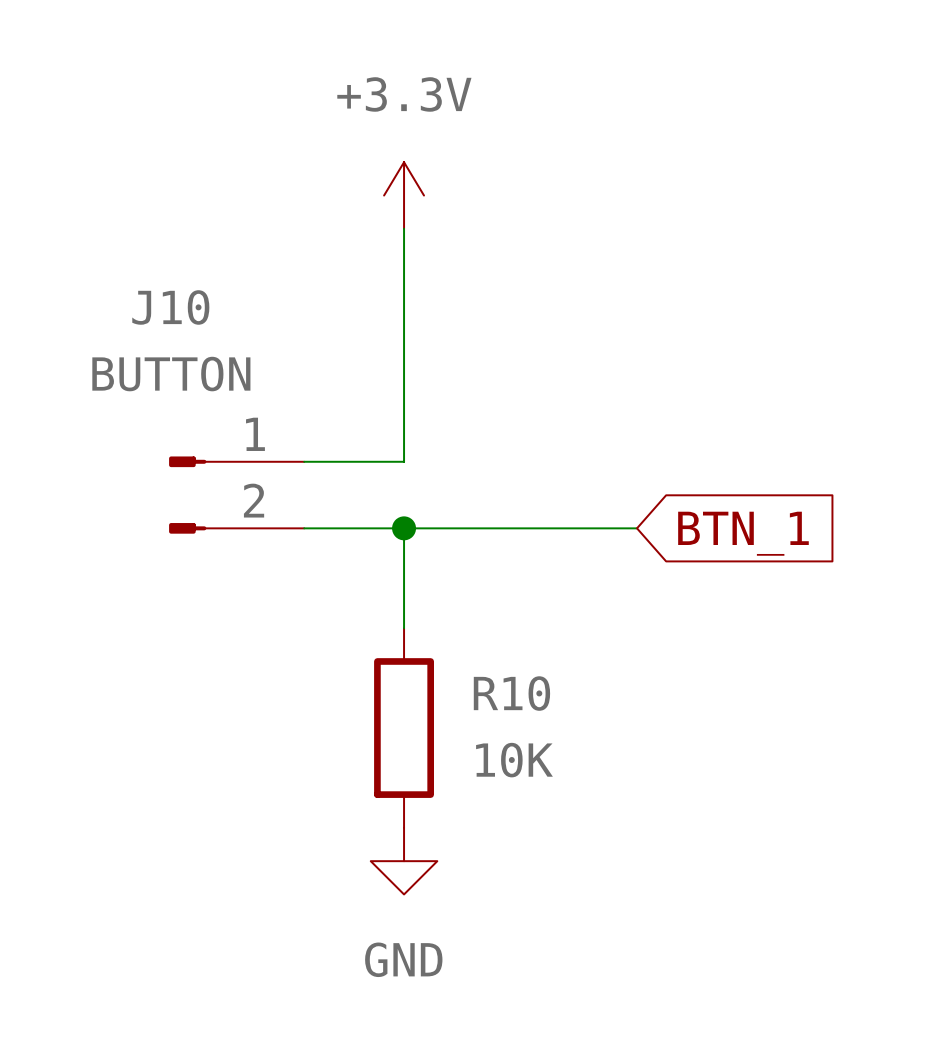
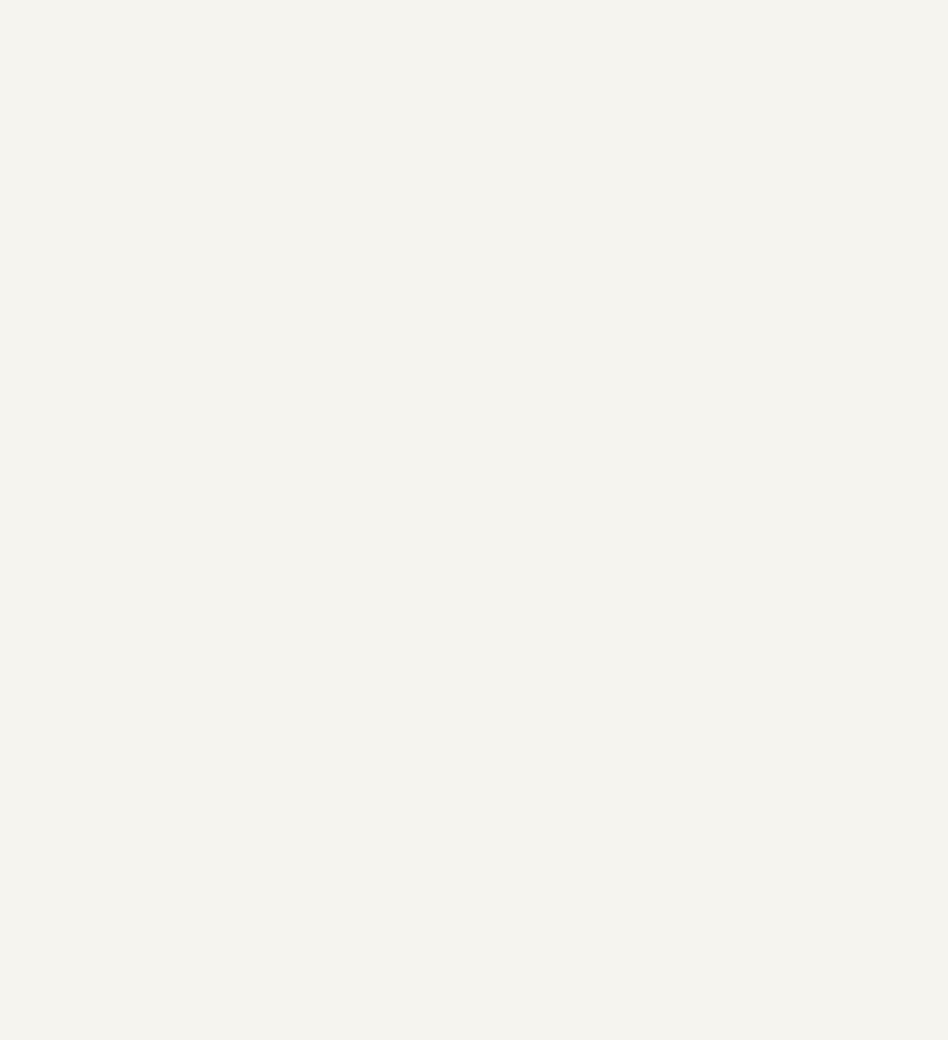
power symbol: +3.3V (404, 195) -> none
wire: (404, 228) (404, 461) (304, 461) -> none
J10: BUTTON (236, 495) -> none
wire: (304, 528) (637, 528) -> none
wire: (404, 528) (404, 628) -> none
junction: (404, 528) -> none
global label: BTN_1 (743, 533) -> none
R10: 10K (404, 728) -> none
power symbol: GND (404, 861) -> none

